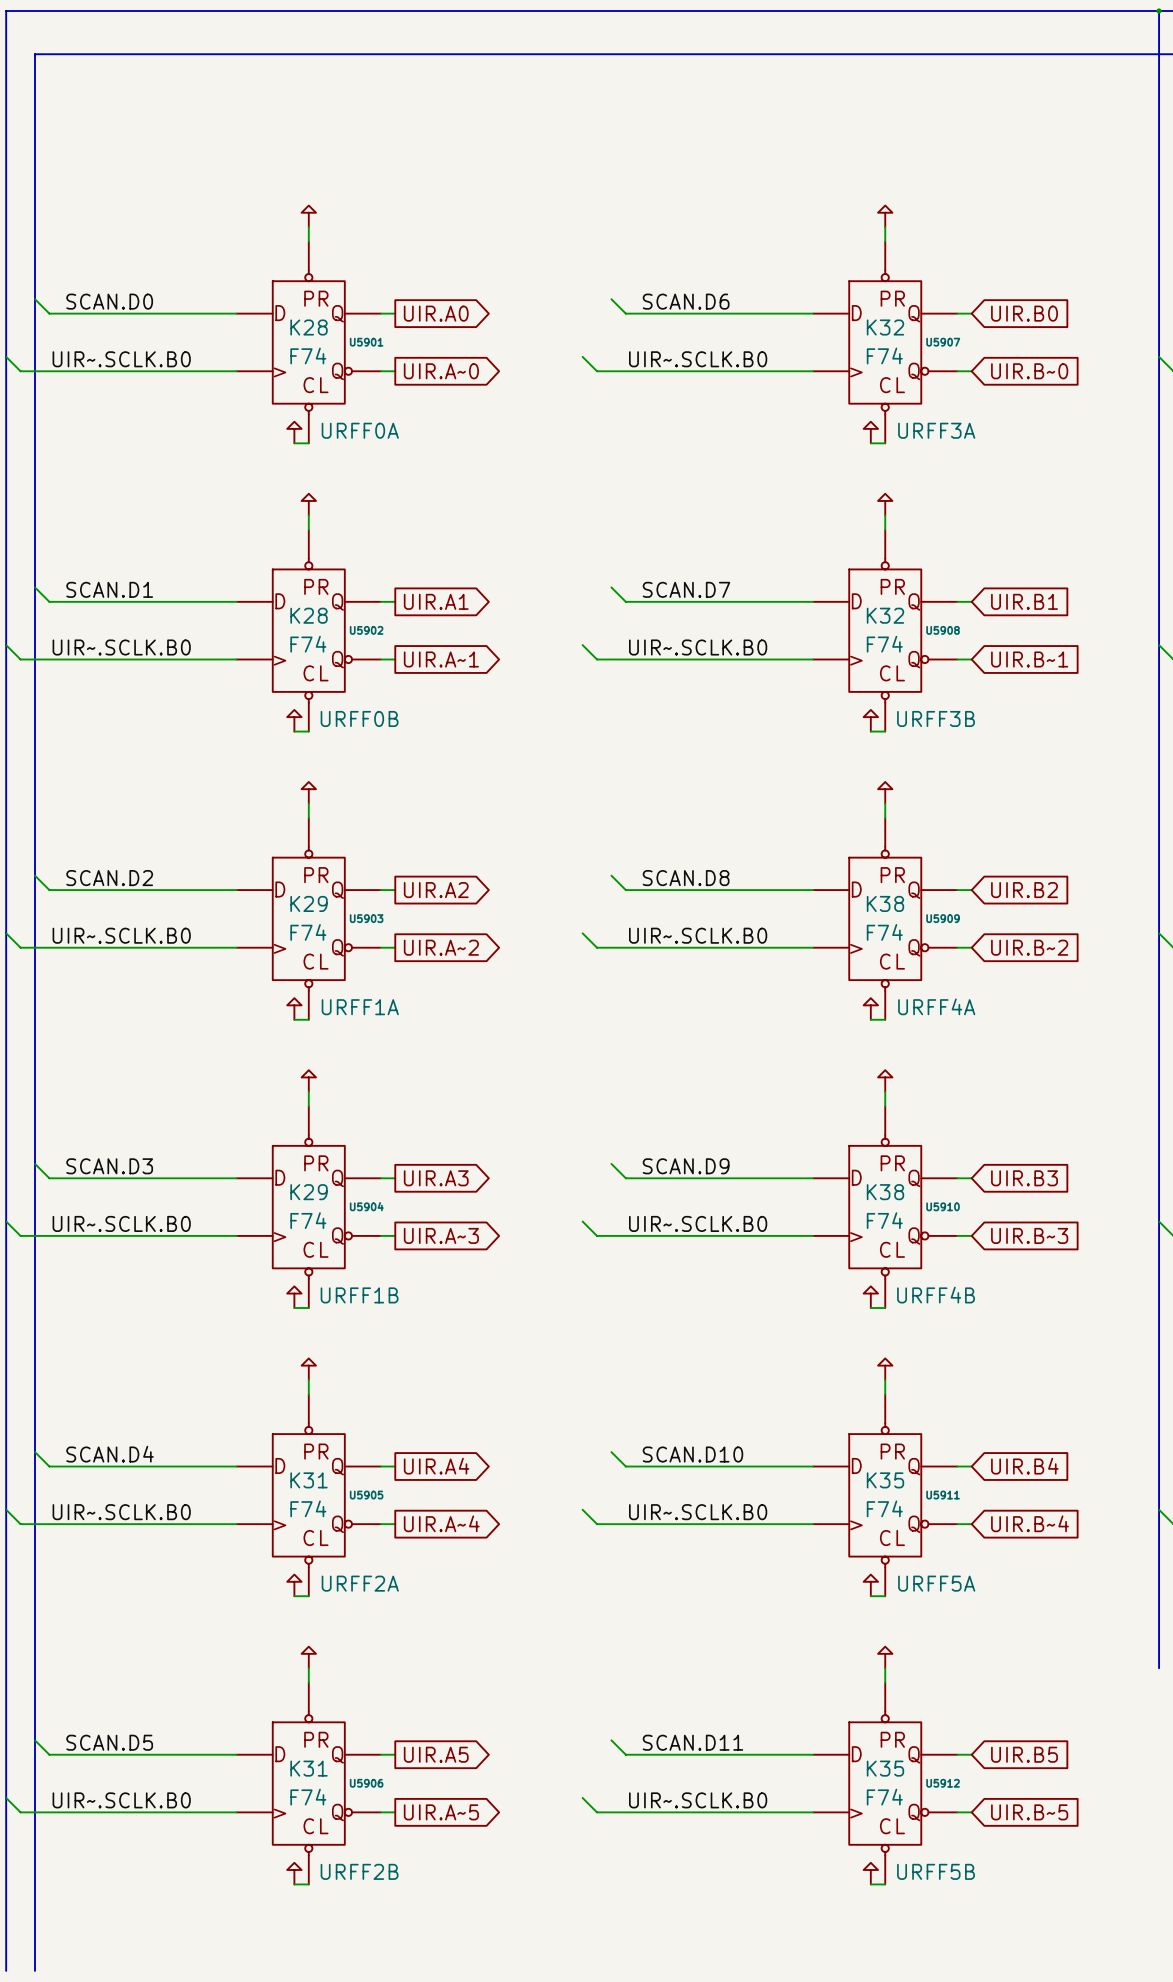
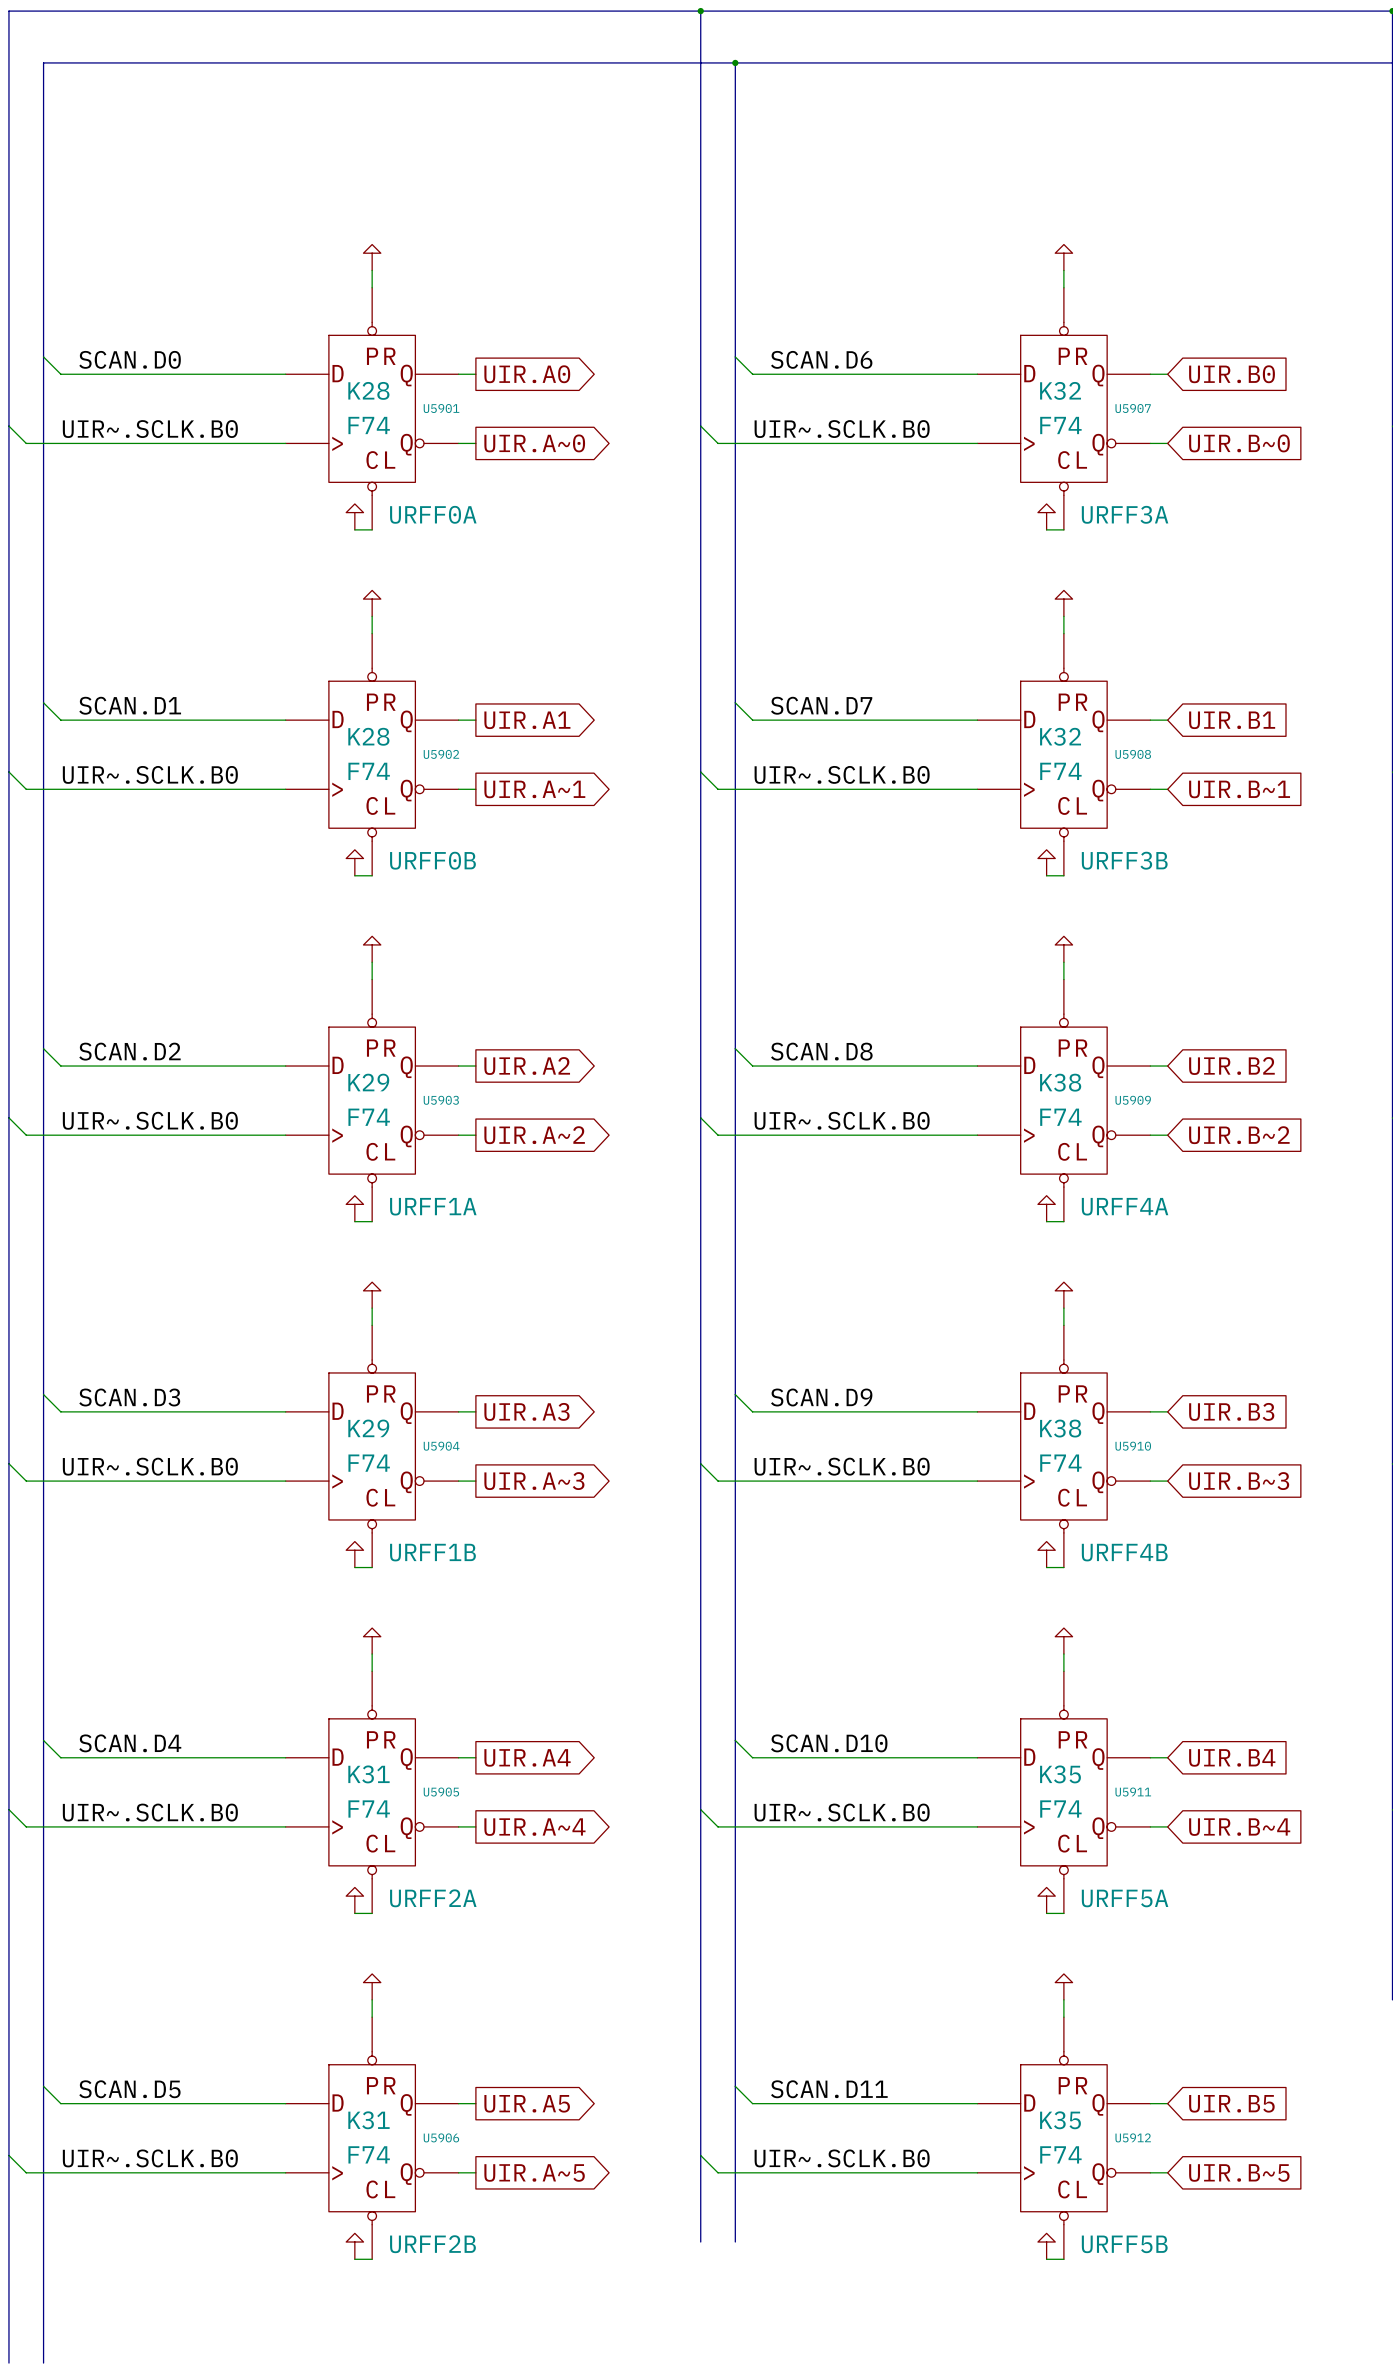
bus: none -> (700, 11) (700, 2242)
junction: none -> (700, 11)
bus: none -> (735, 62) (735, 2242)
junction: none -> (735, 62)

